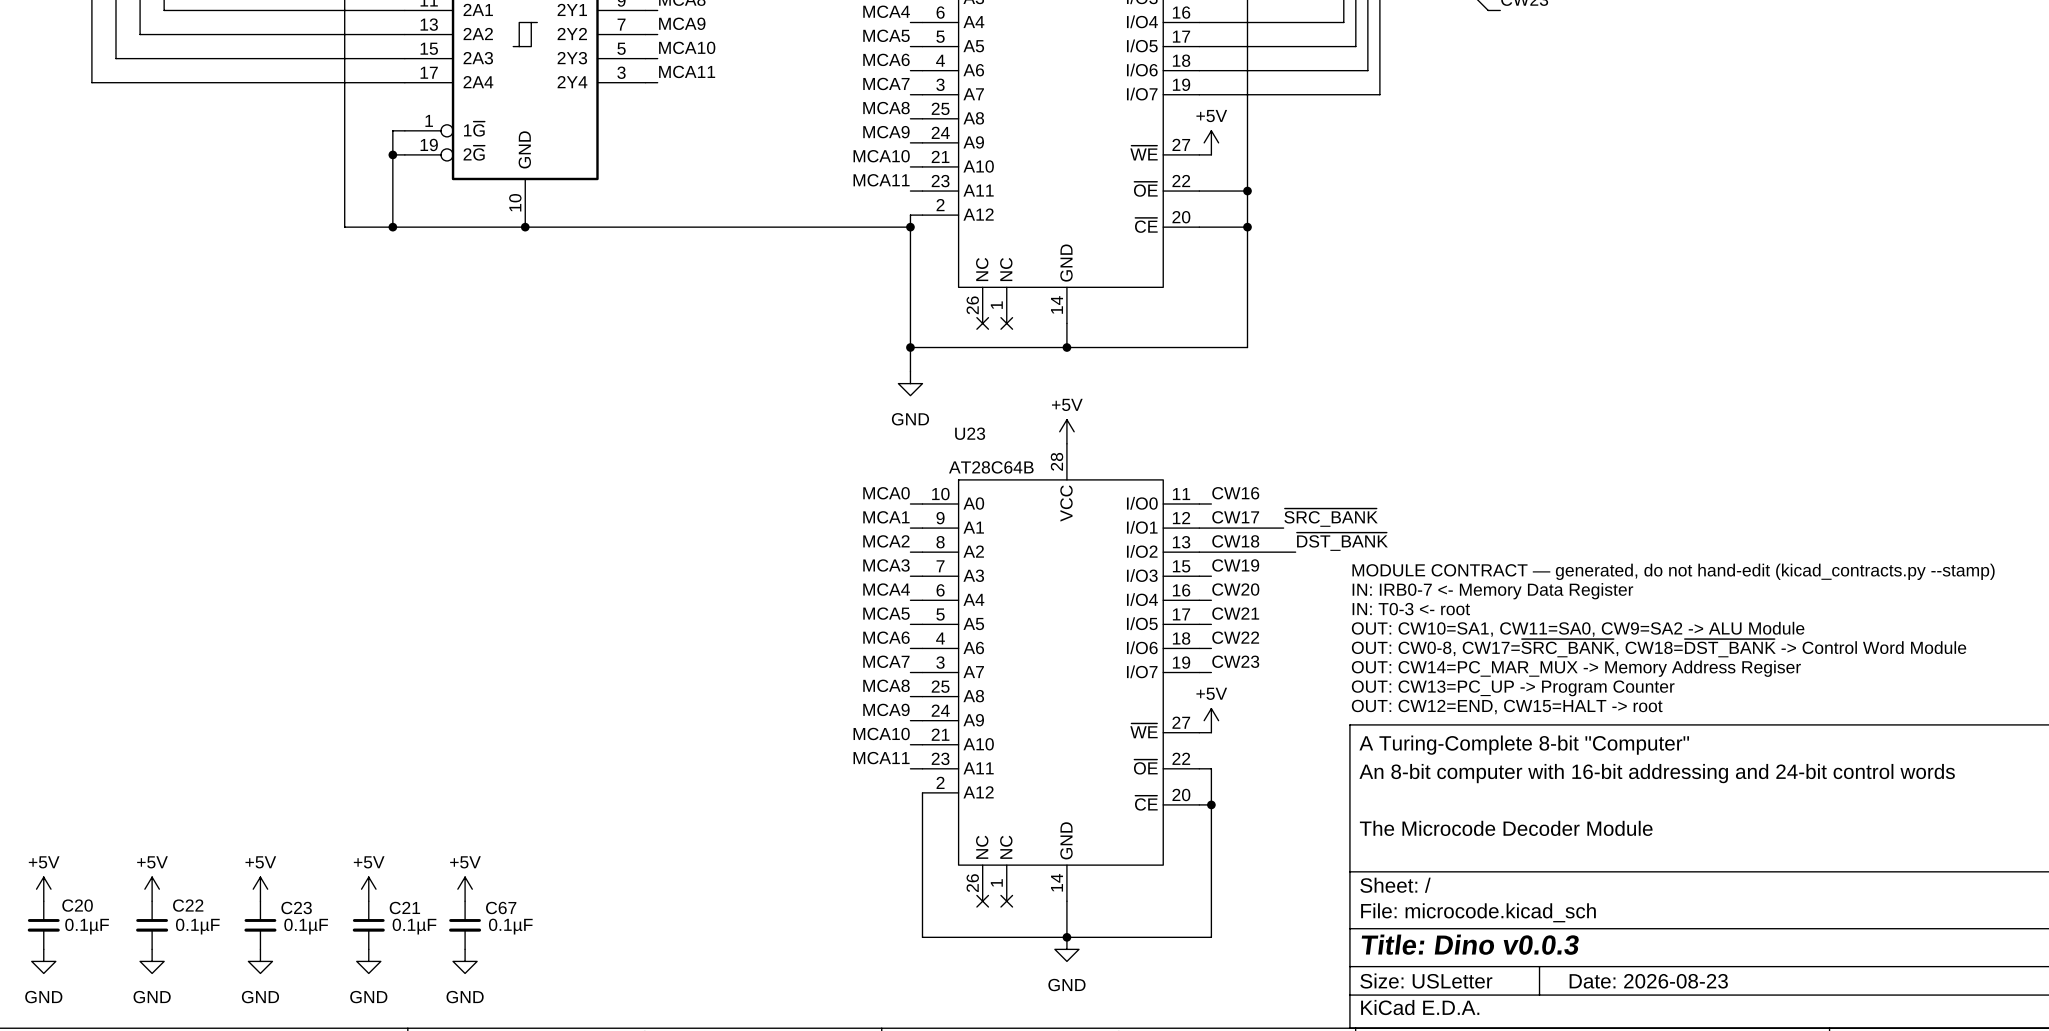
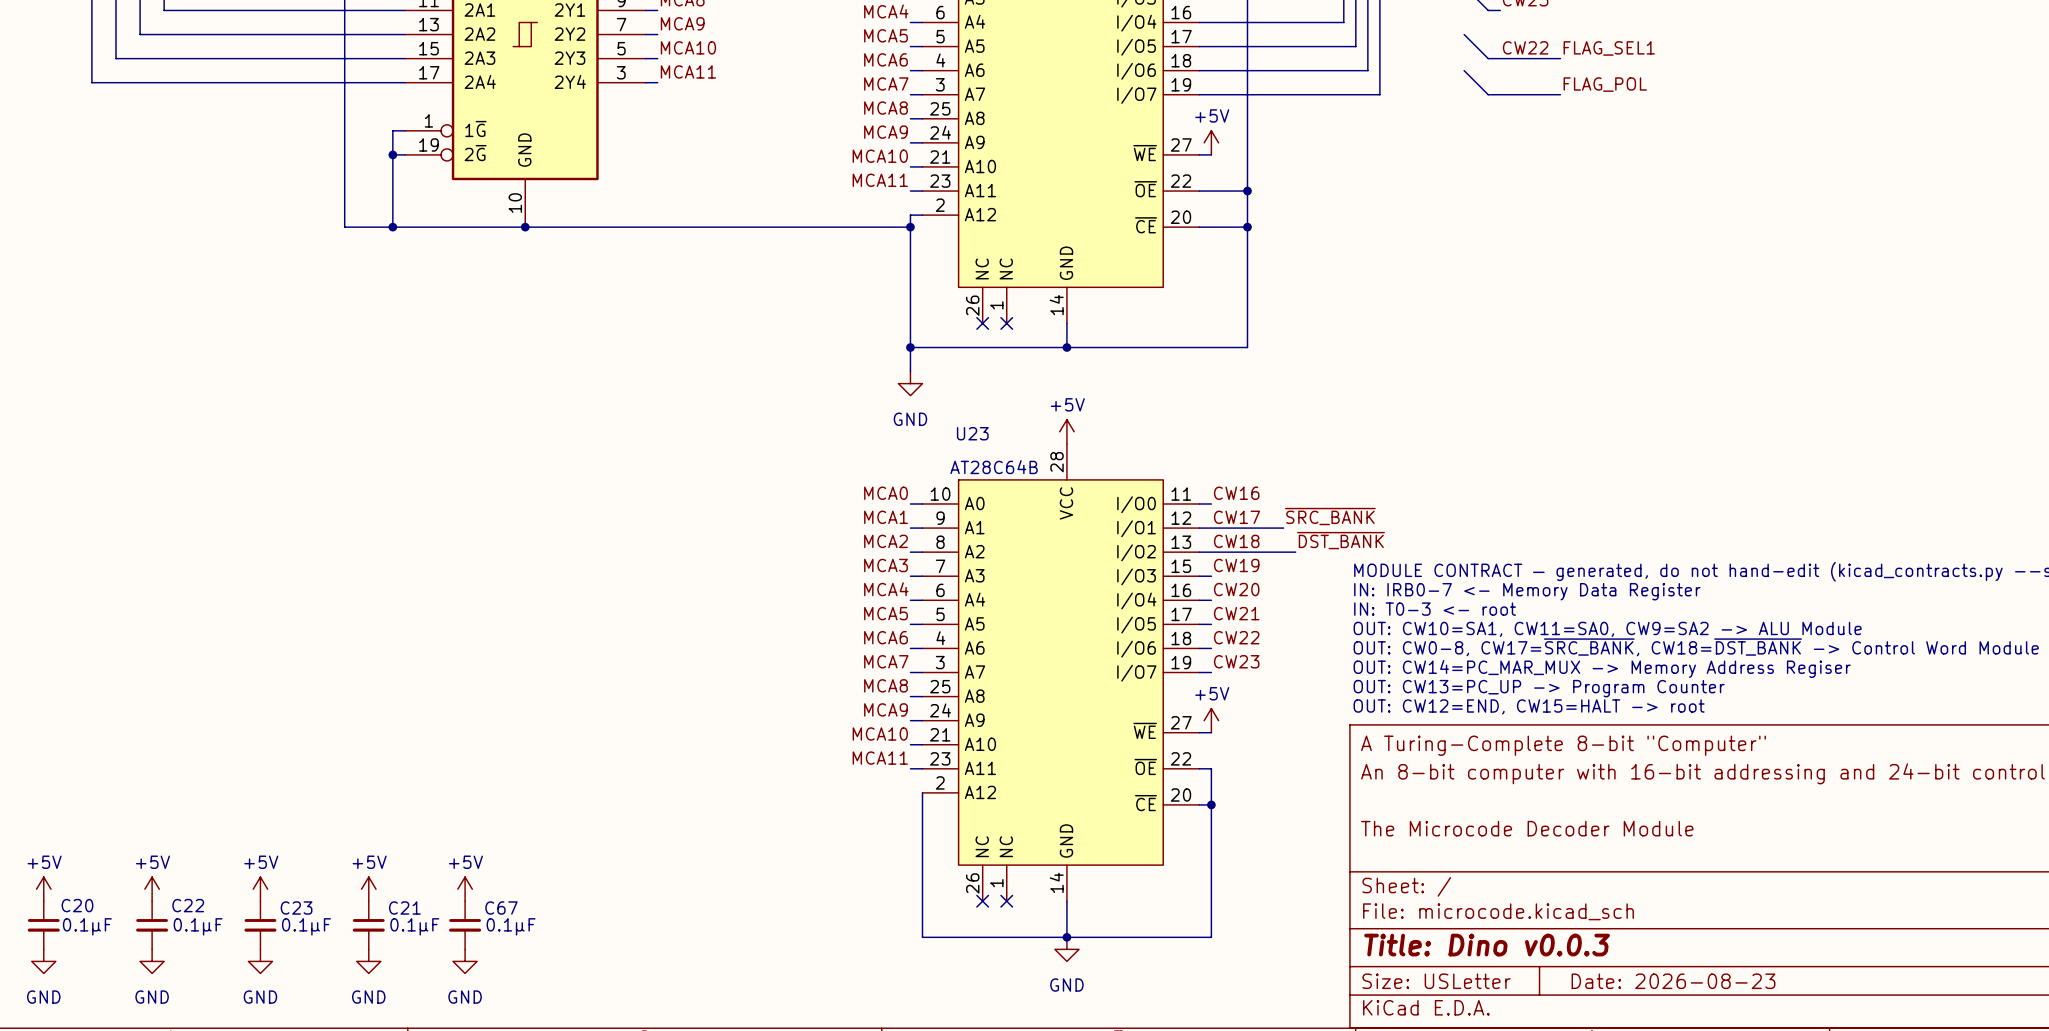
wire: none -> (1464, 34) (1488, 58) (1560, 58)
label: none -> CW22 (1525, 47)
label: none -> FLAG_SEL1 (1609, 48)
wire: none -> (1464, 70) (1488, 94) (1560, 94)
label: none -> FLAG_POL (1605, 84)

